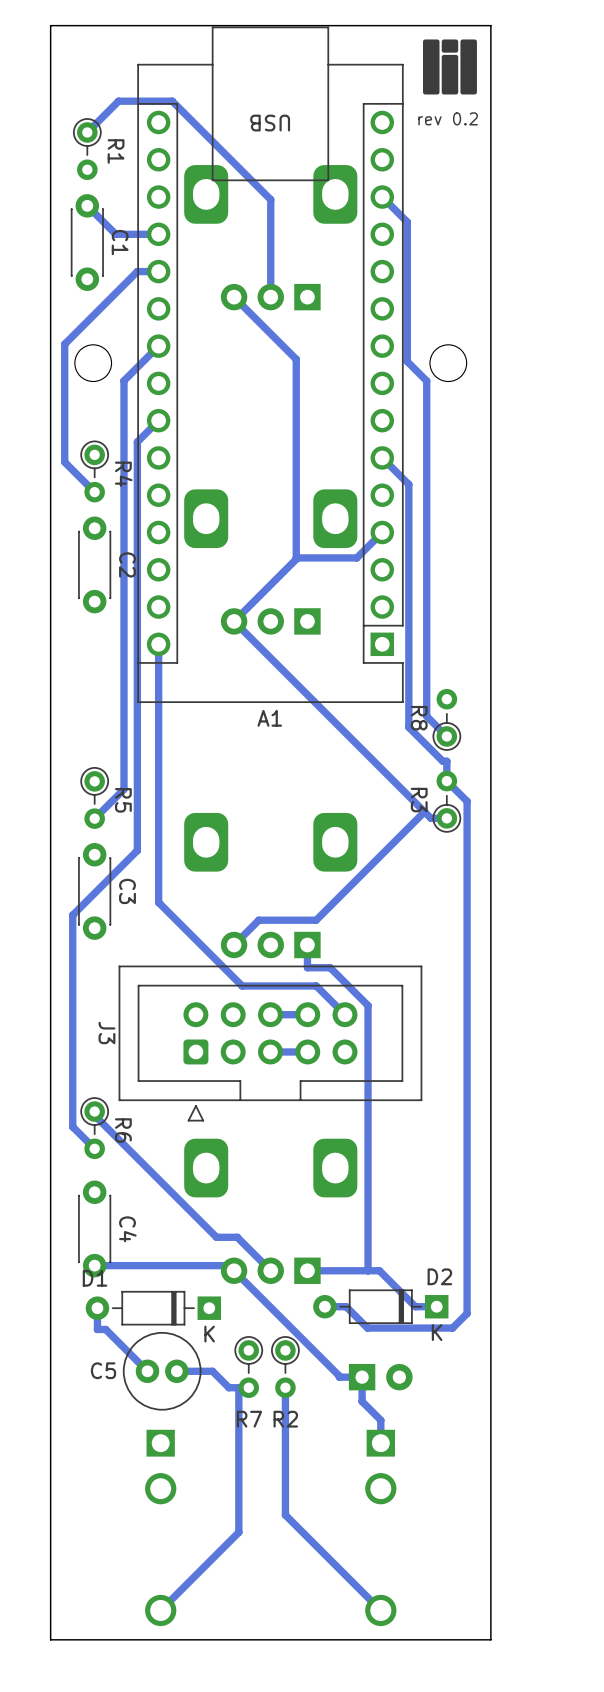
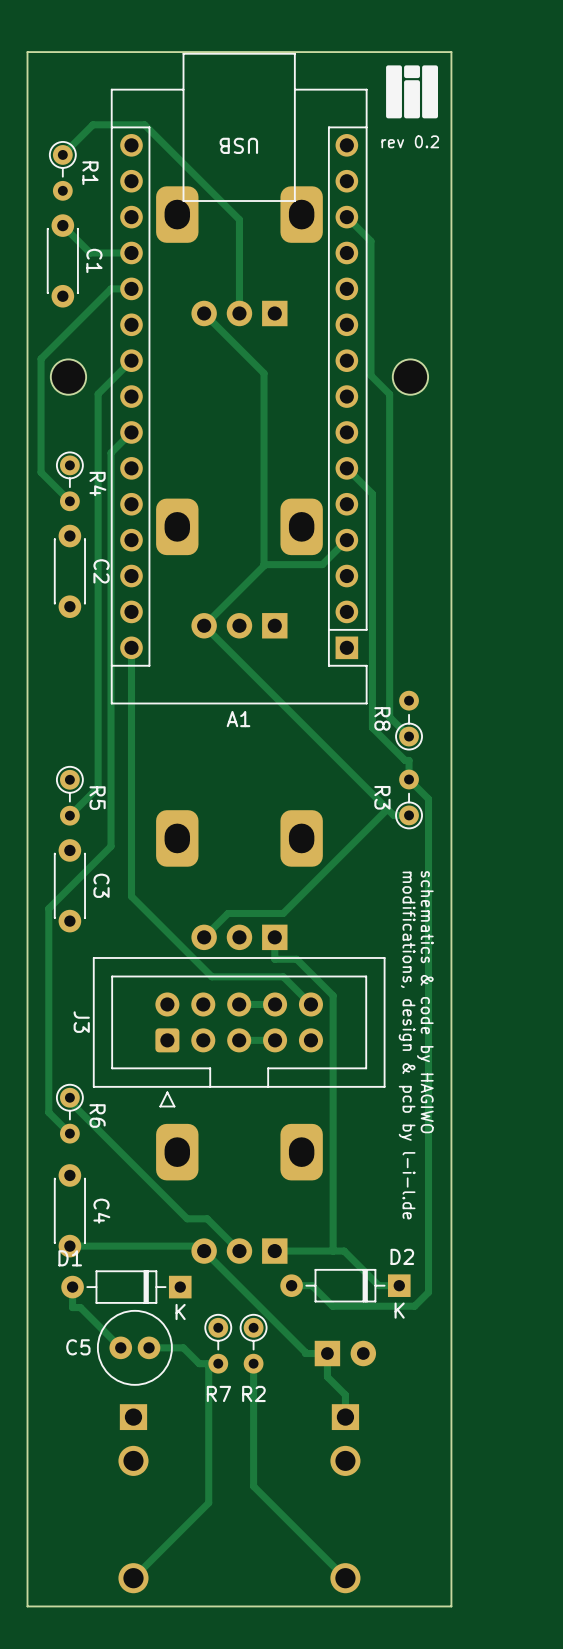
text: none -> schematics & code by HAGIWO (425, 1002)
text: none -> modifications, design & pcb by l-i-l.de (407, 1045)

